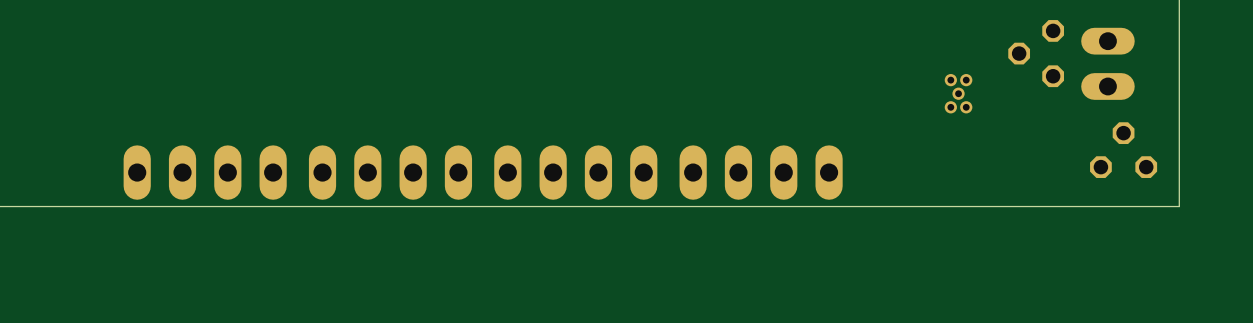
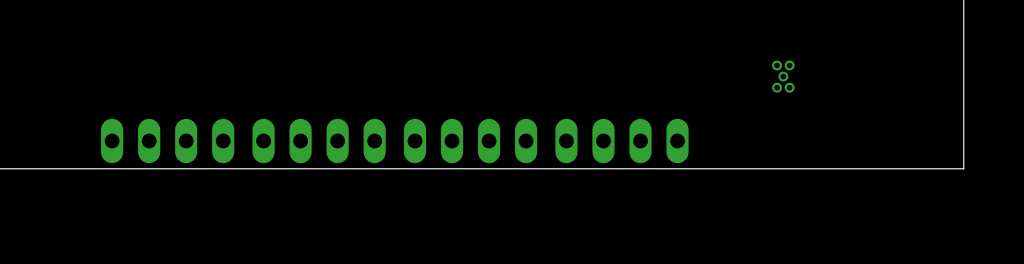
part: (1036, 53) -> none
part: (1107, 63) -> none
part: (1123, 150) -> none

